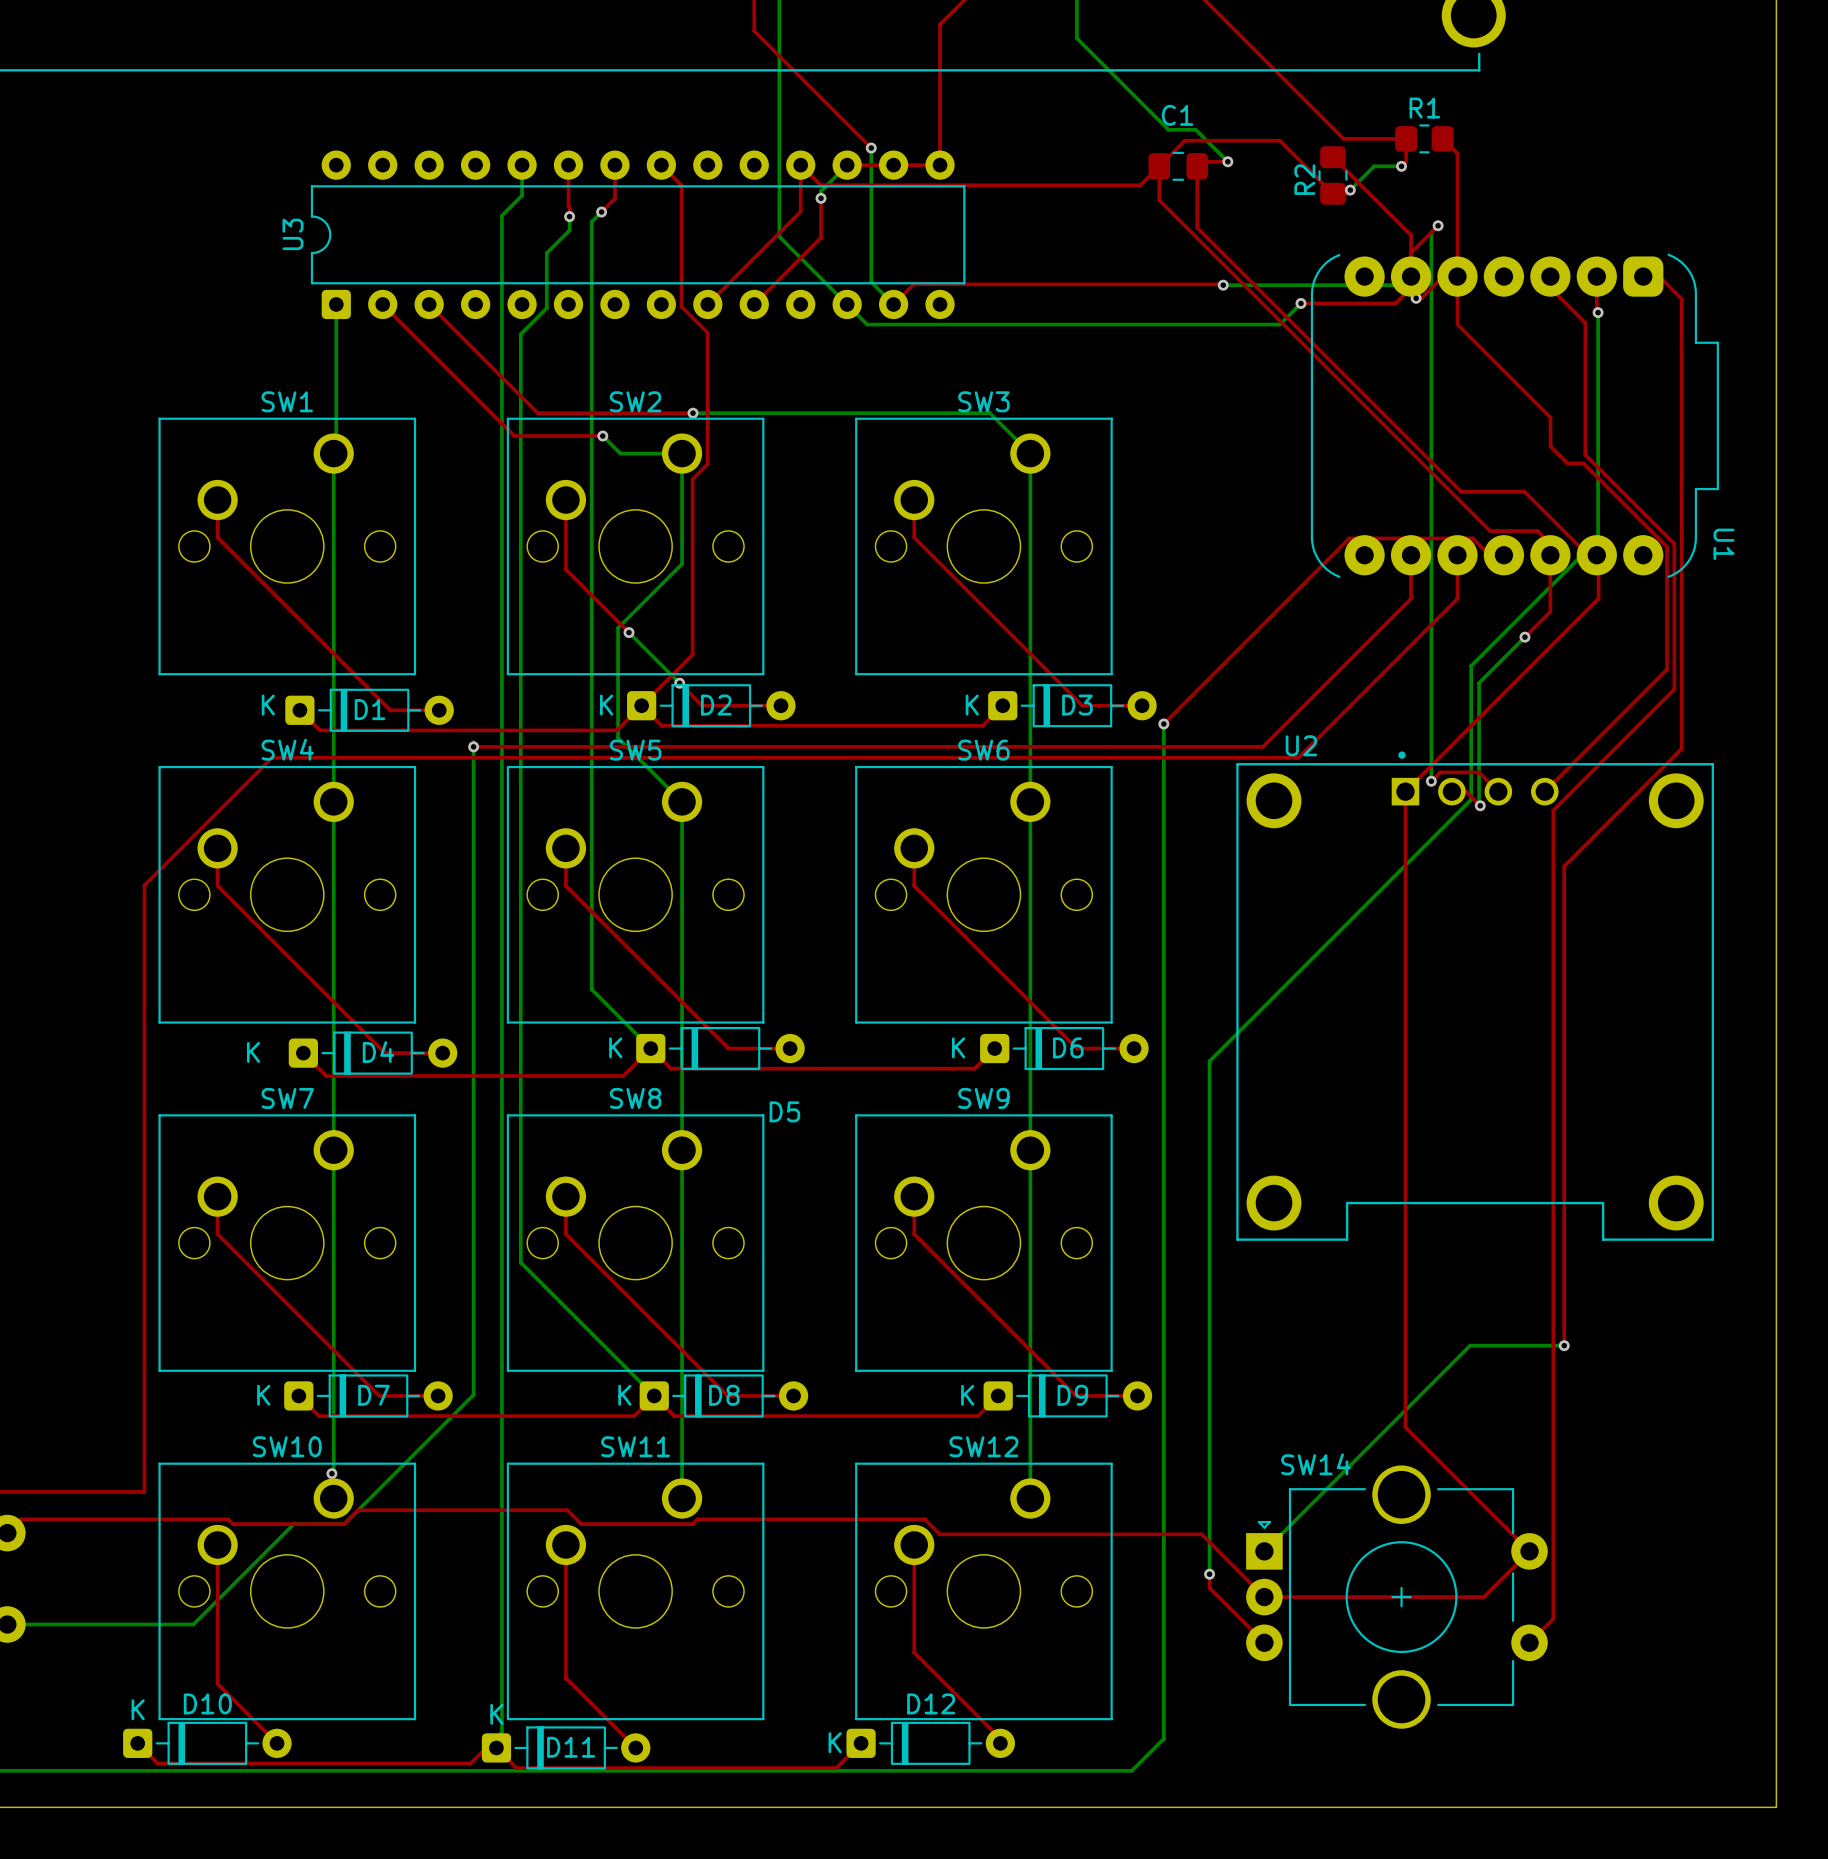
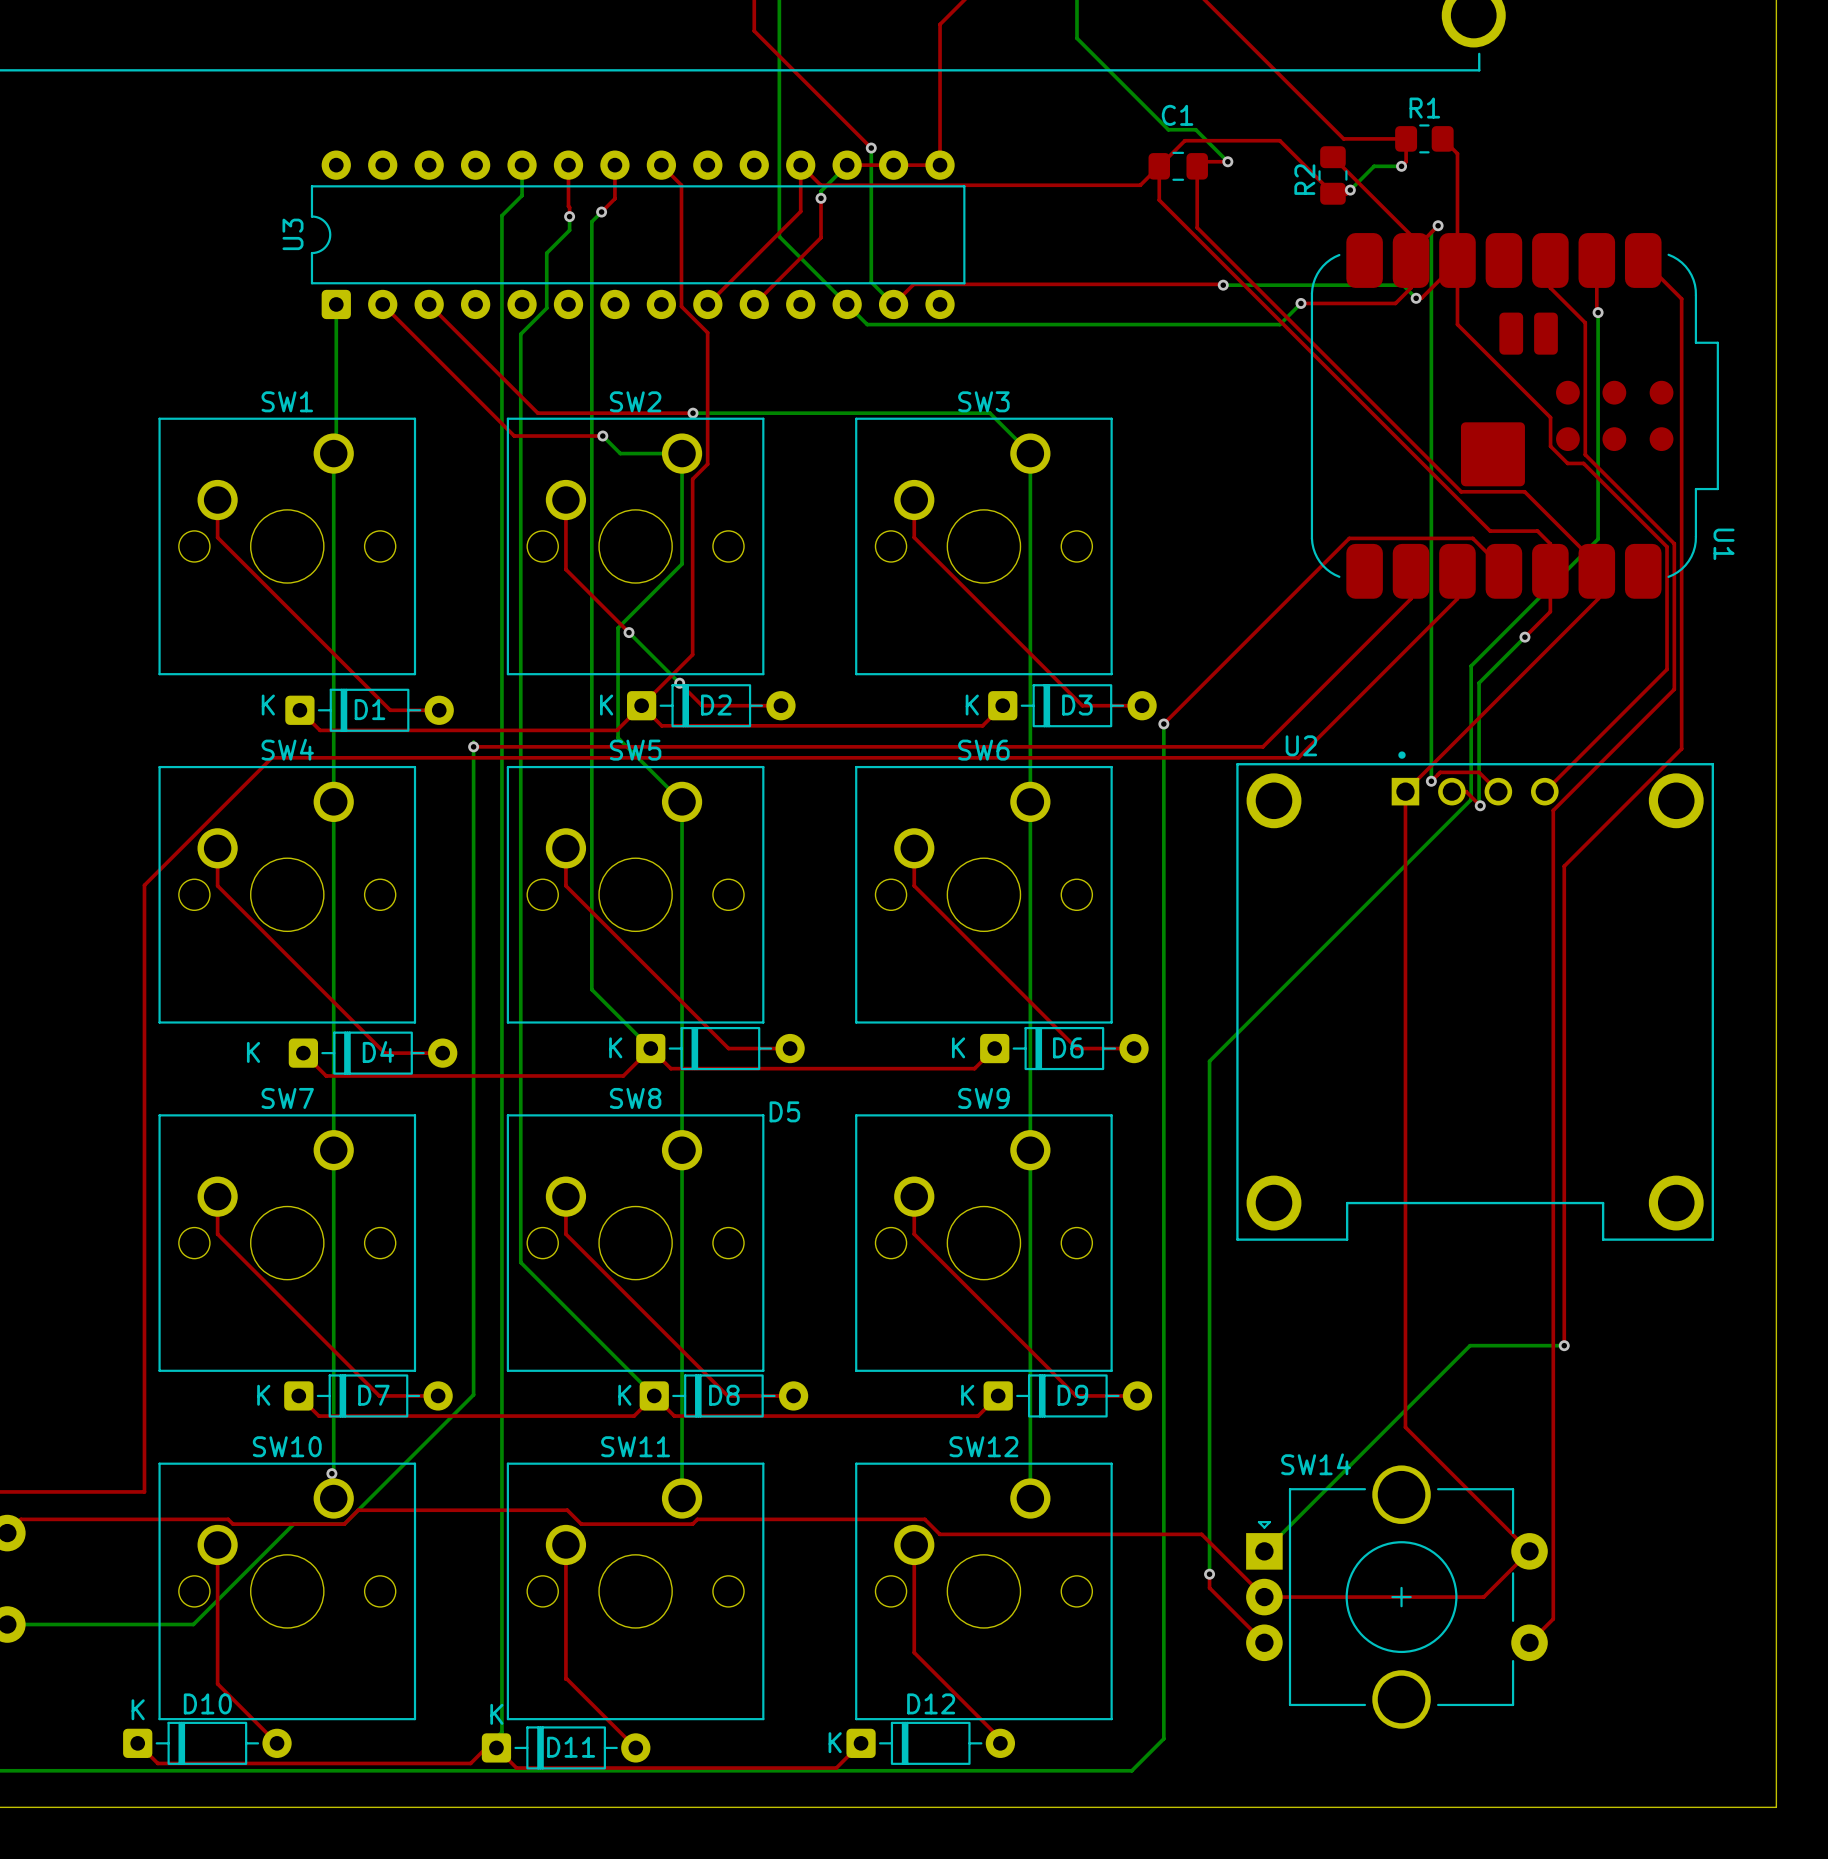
U1 footprint: [1310, 253, 1719, 578] -> [1310, 233, 1719, 599]

